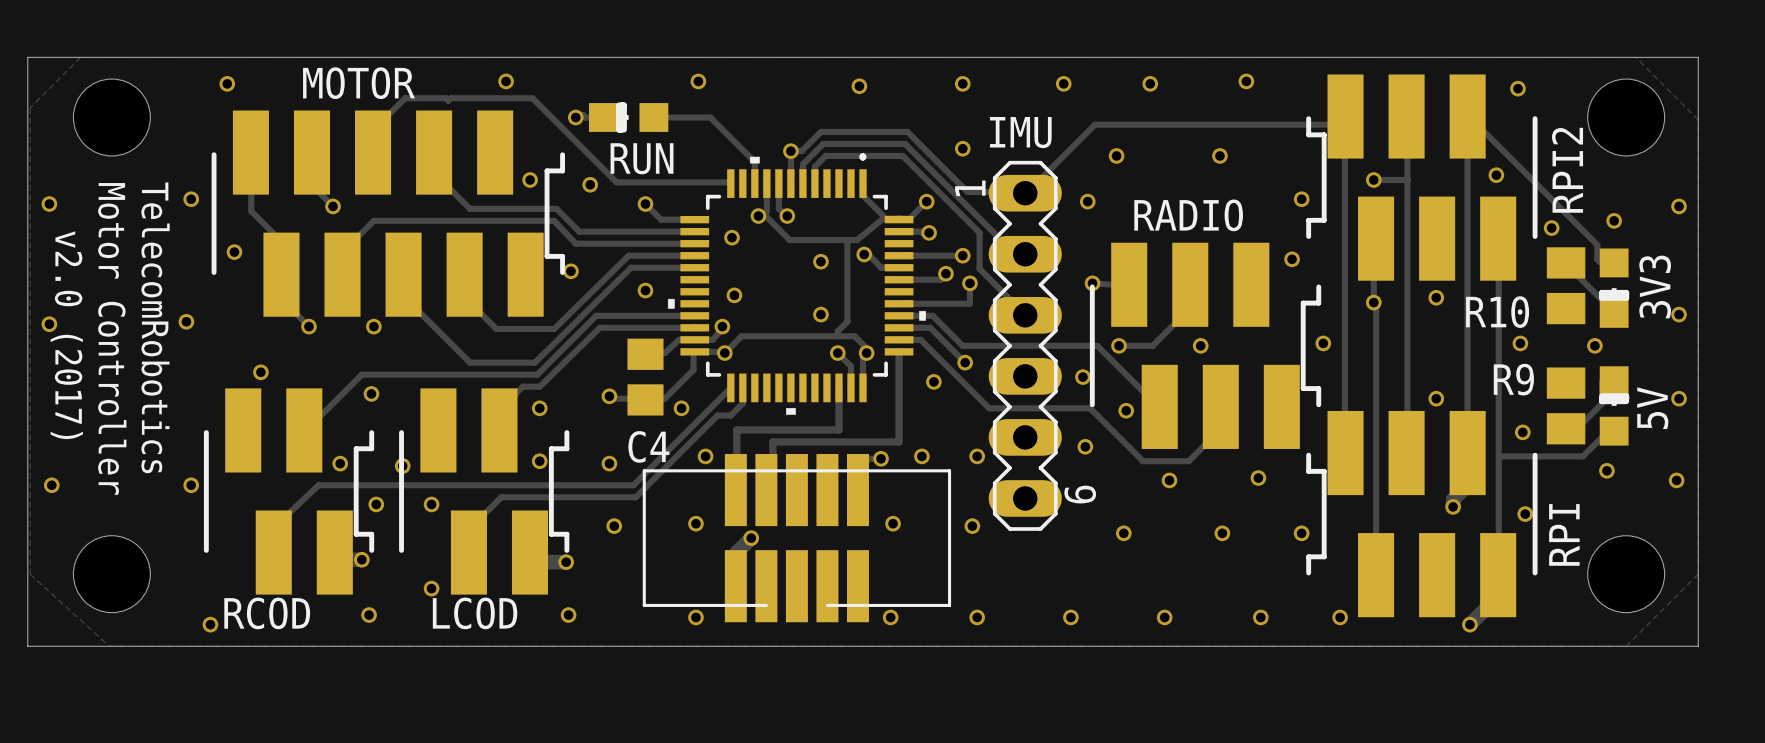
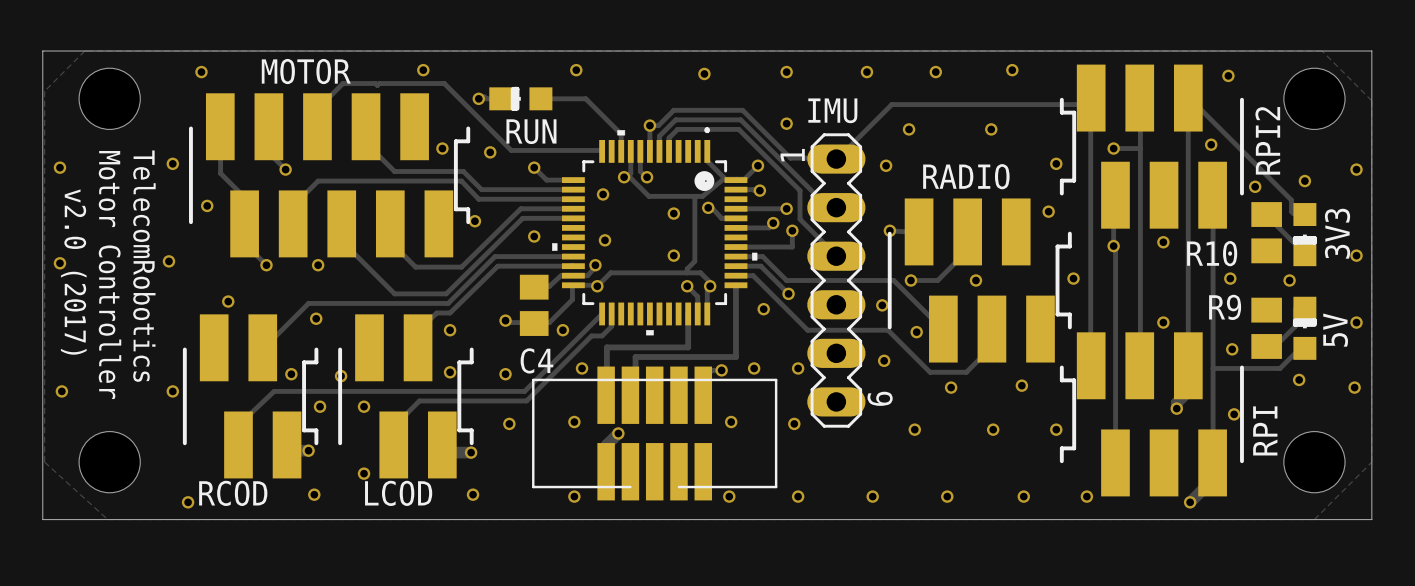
drawing: none -> [694, 171, 715, 191]

